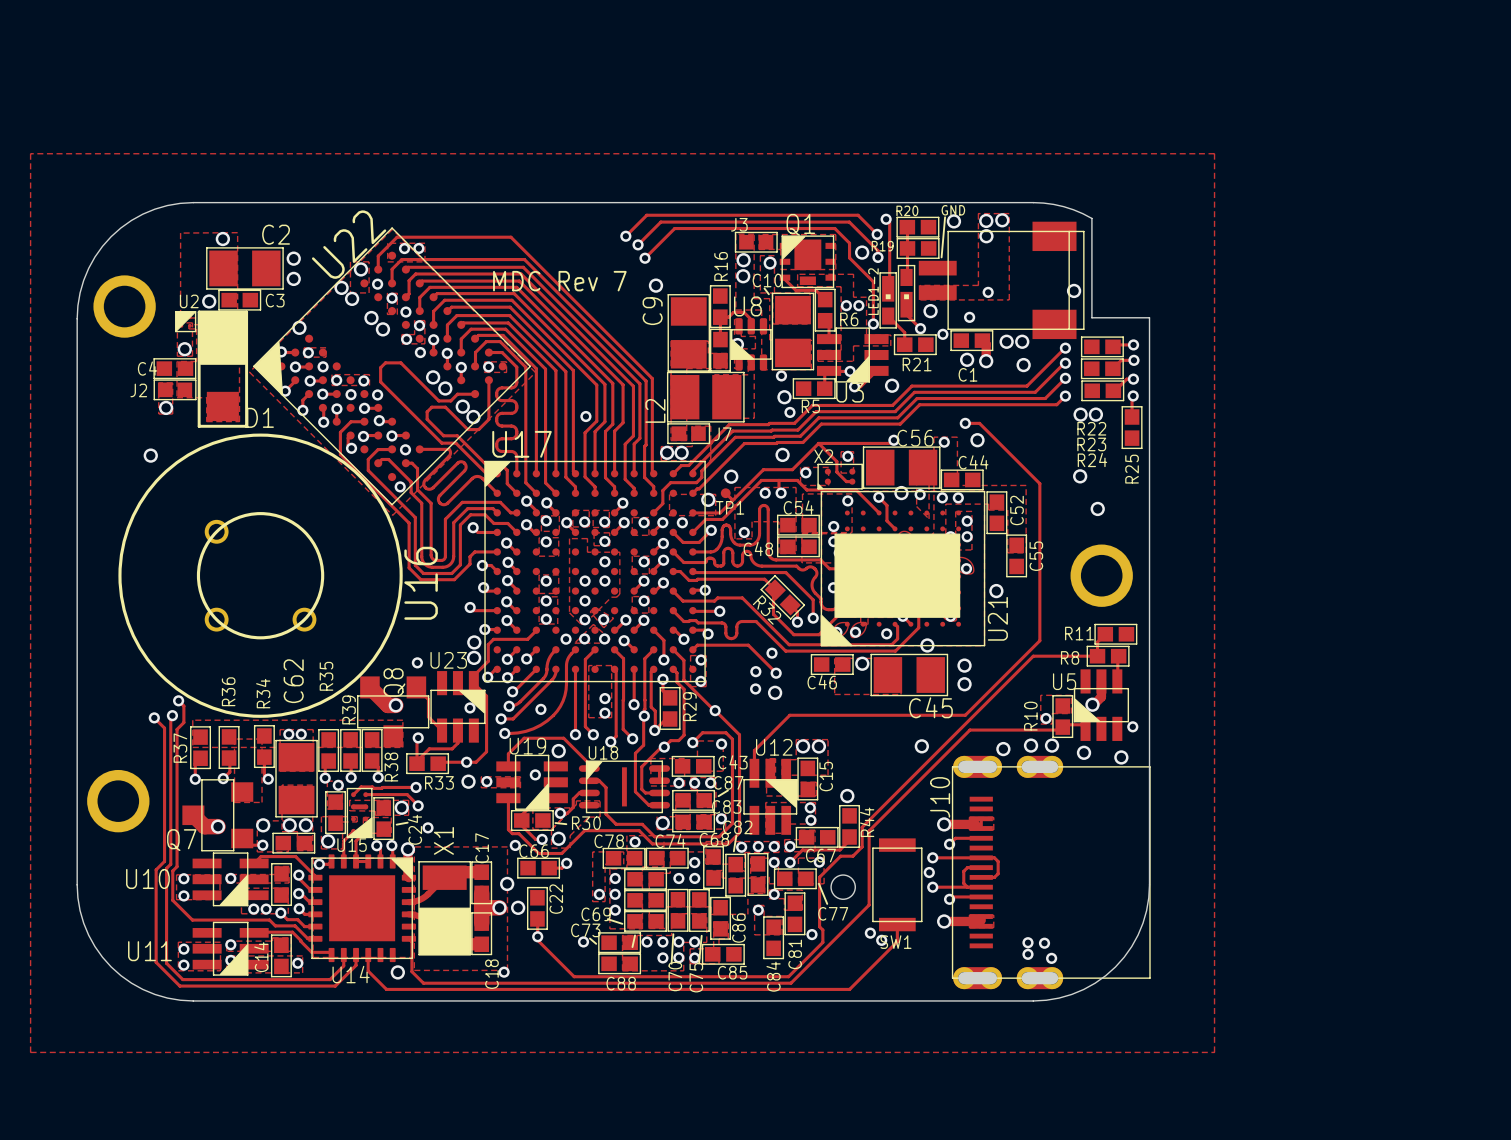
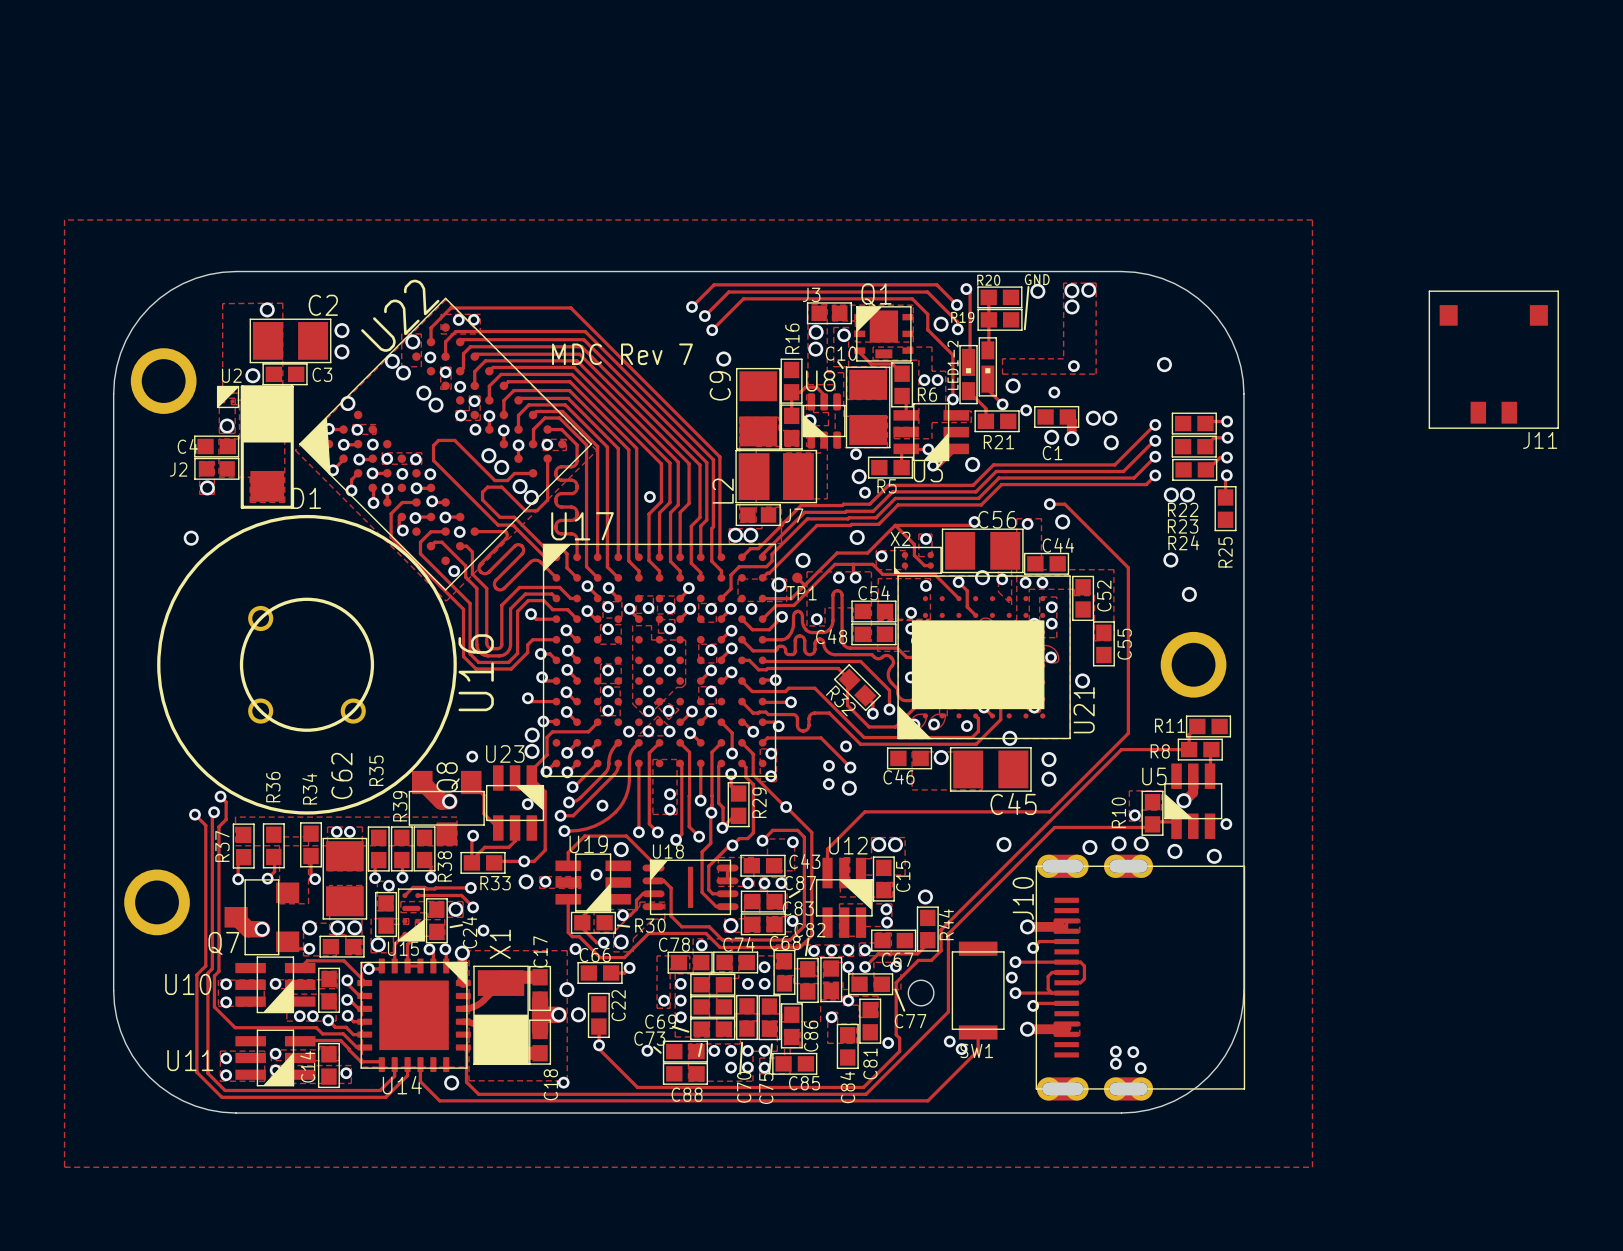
board edge: (1033, 202) (1063, 206) (1091, 218) (1091, 317) (1149, 318) -> (1121, 271) (1148, 274) (1174, 283) (1186, 290) (1208, 307) (1225, 328) (1231, 340) (1240, 366) (1243, 393)
part: (1001, 280) -> none
J11: none -> (1493, 359)

